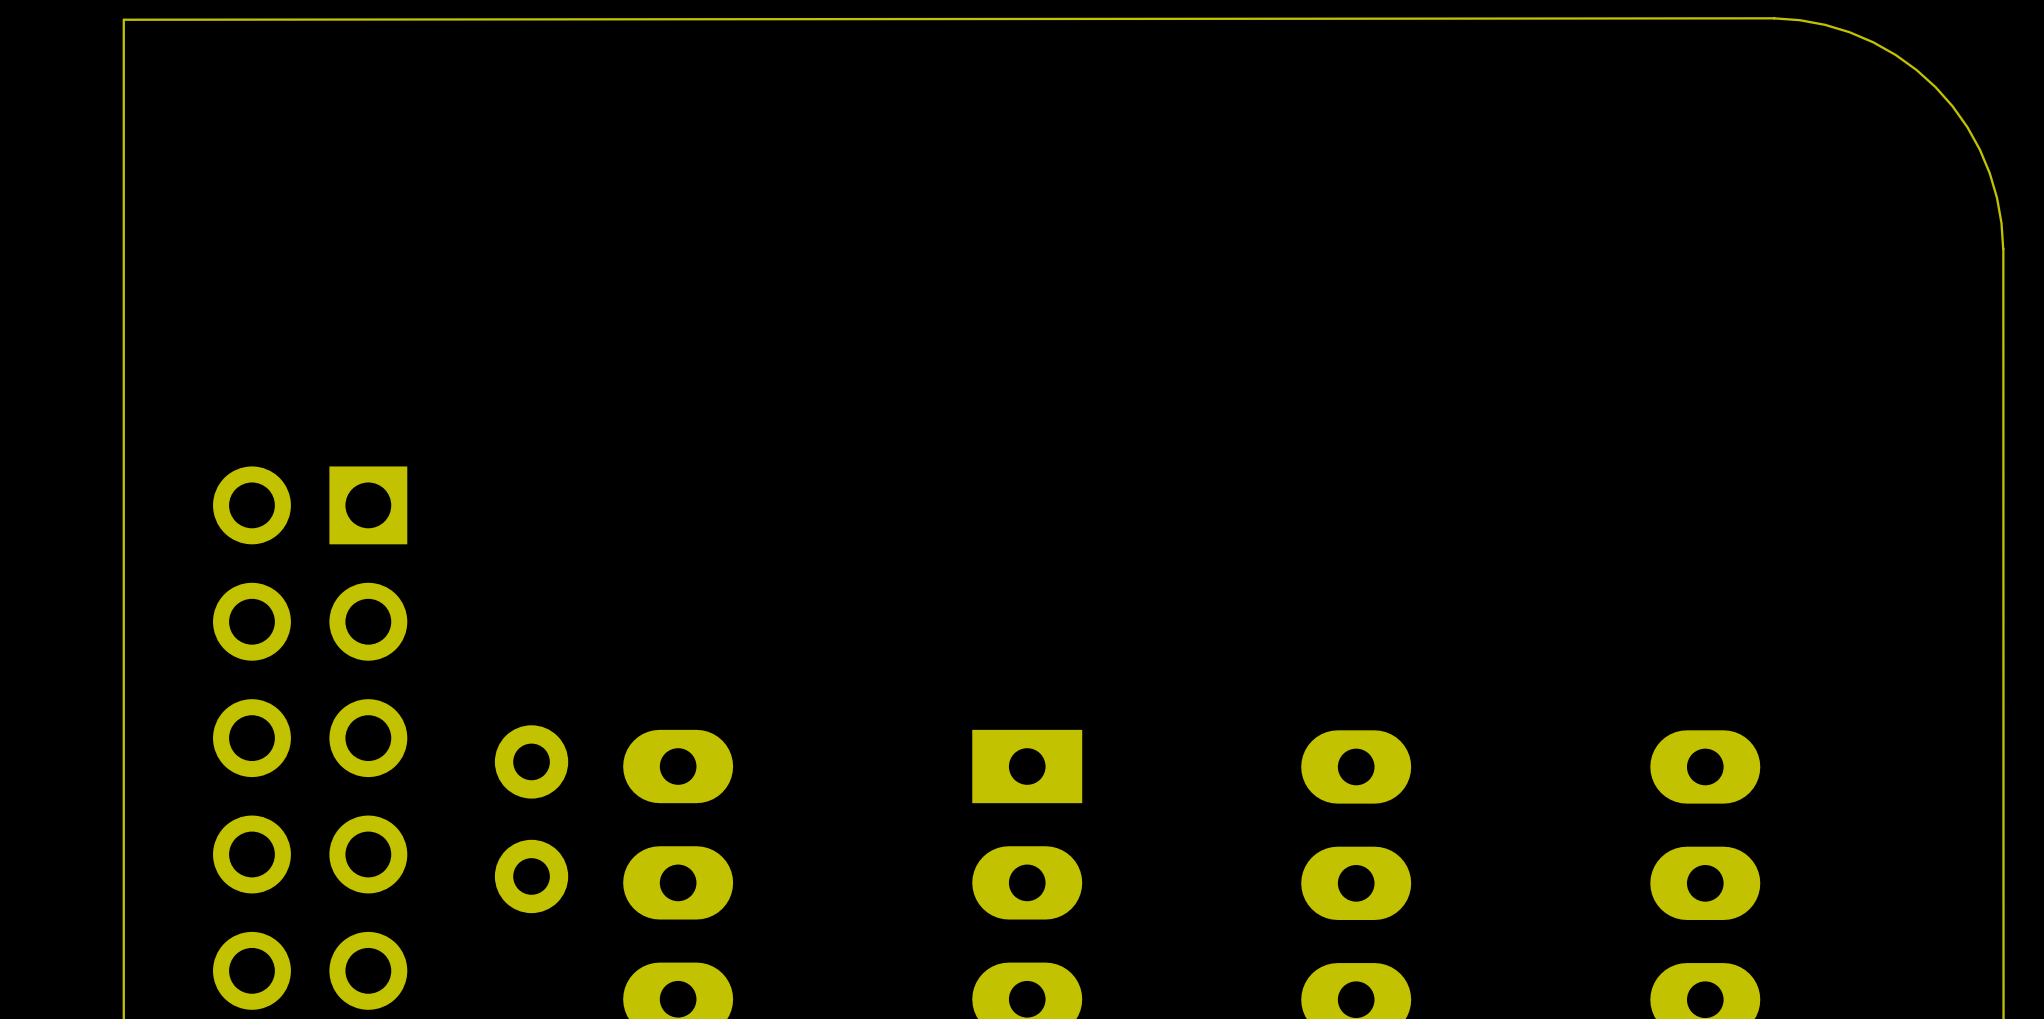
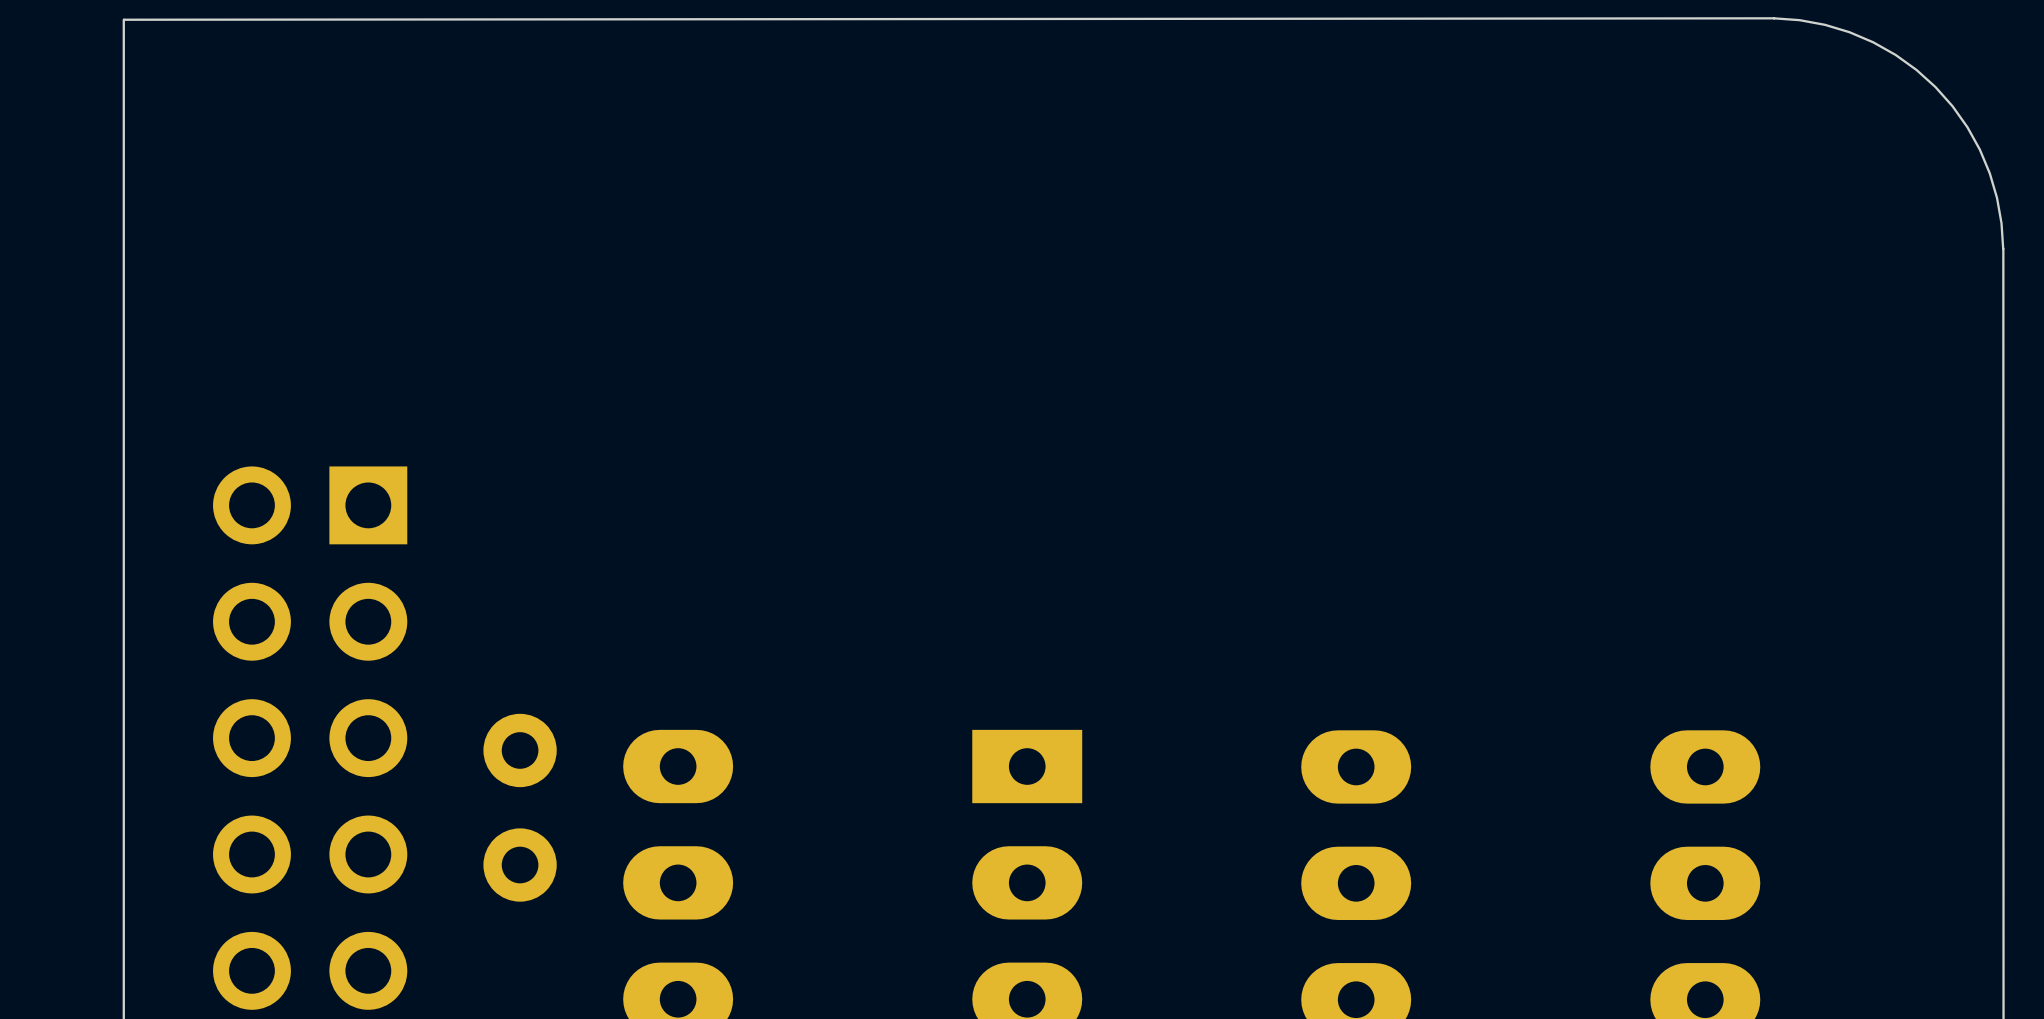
part position: (531, 819) -> (520, 807)

